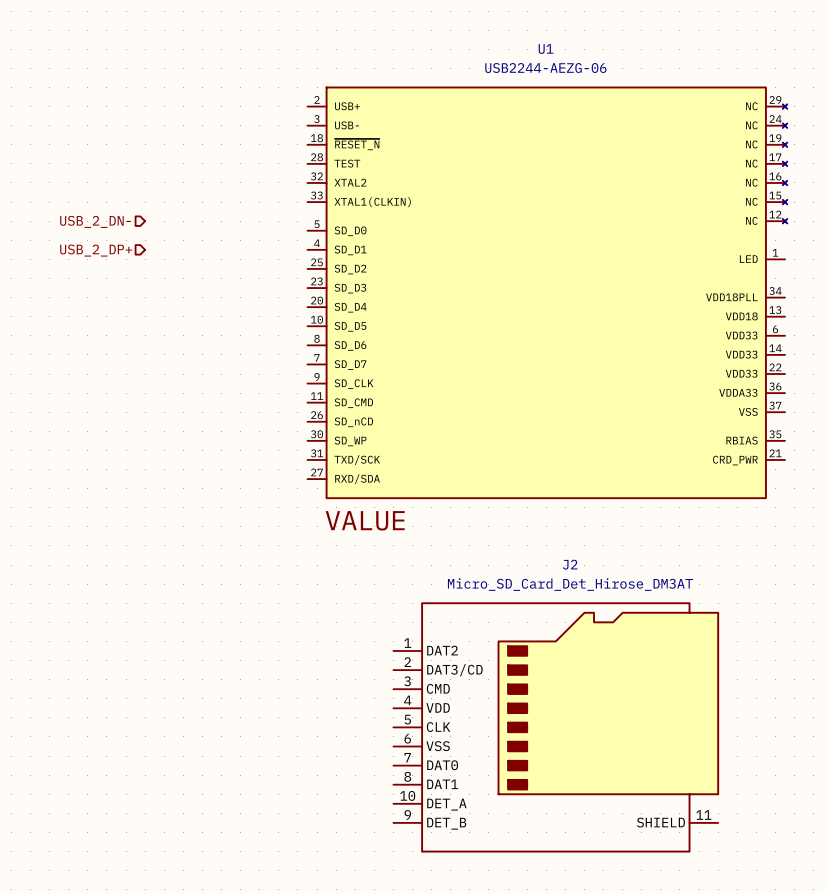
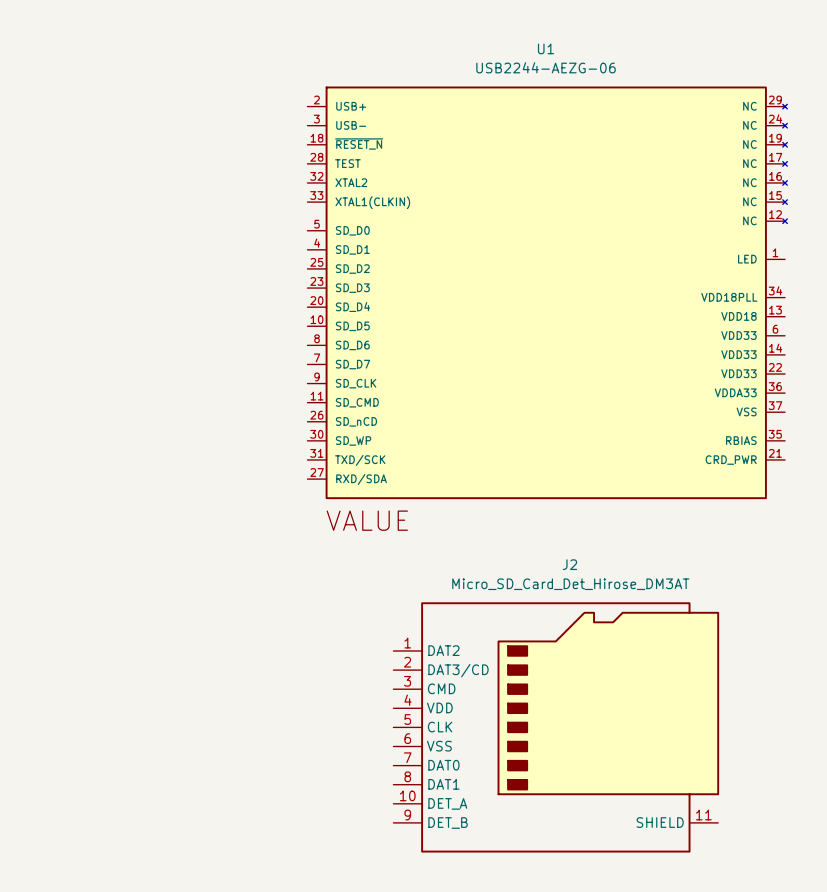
hierarchical label: USB_2_DN- (95, 221) -> none
hierarchical label: USB_2_DP+ (96, 250) -> none

